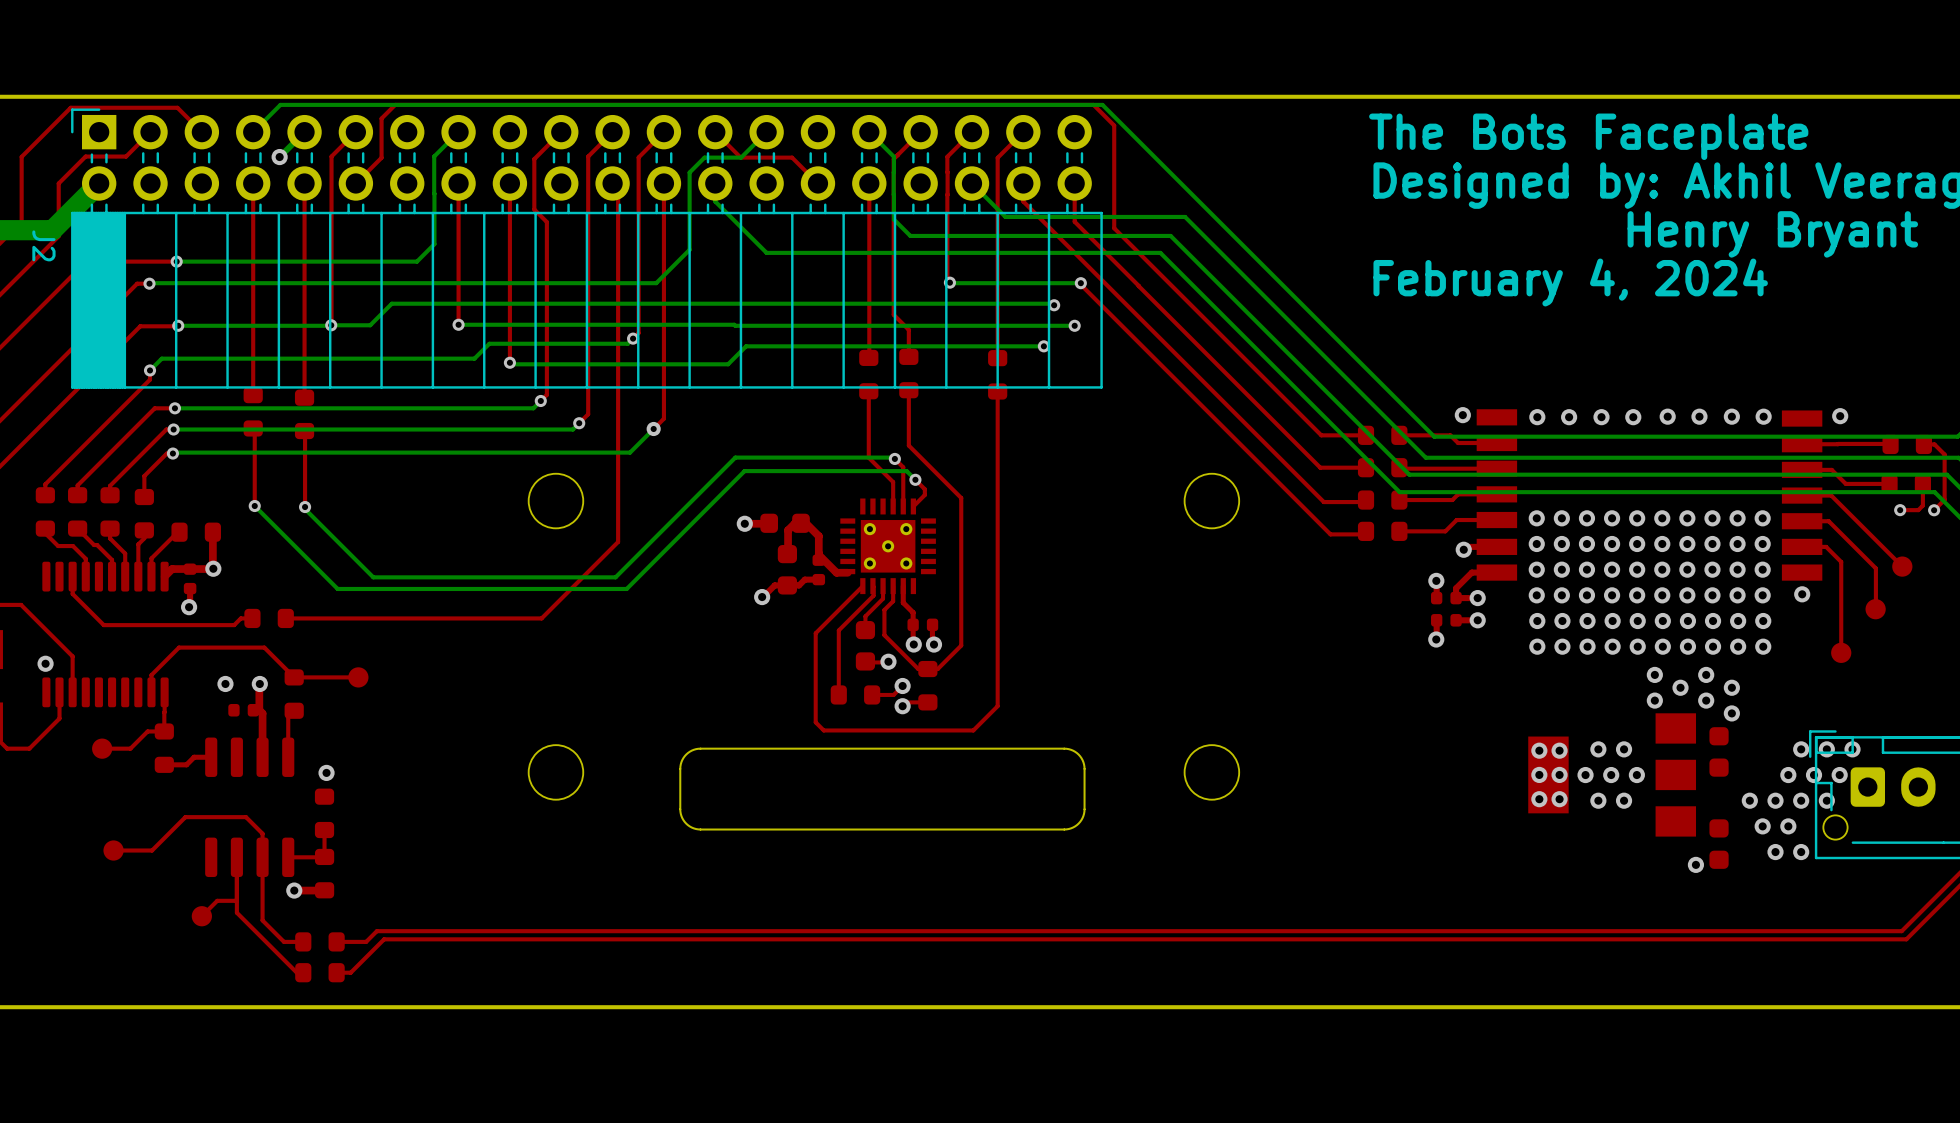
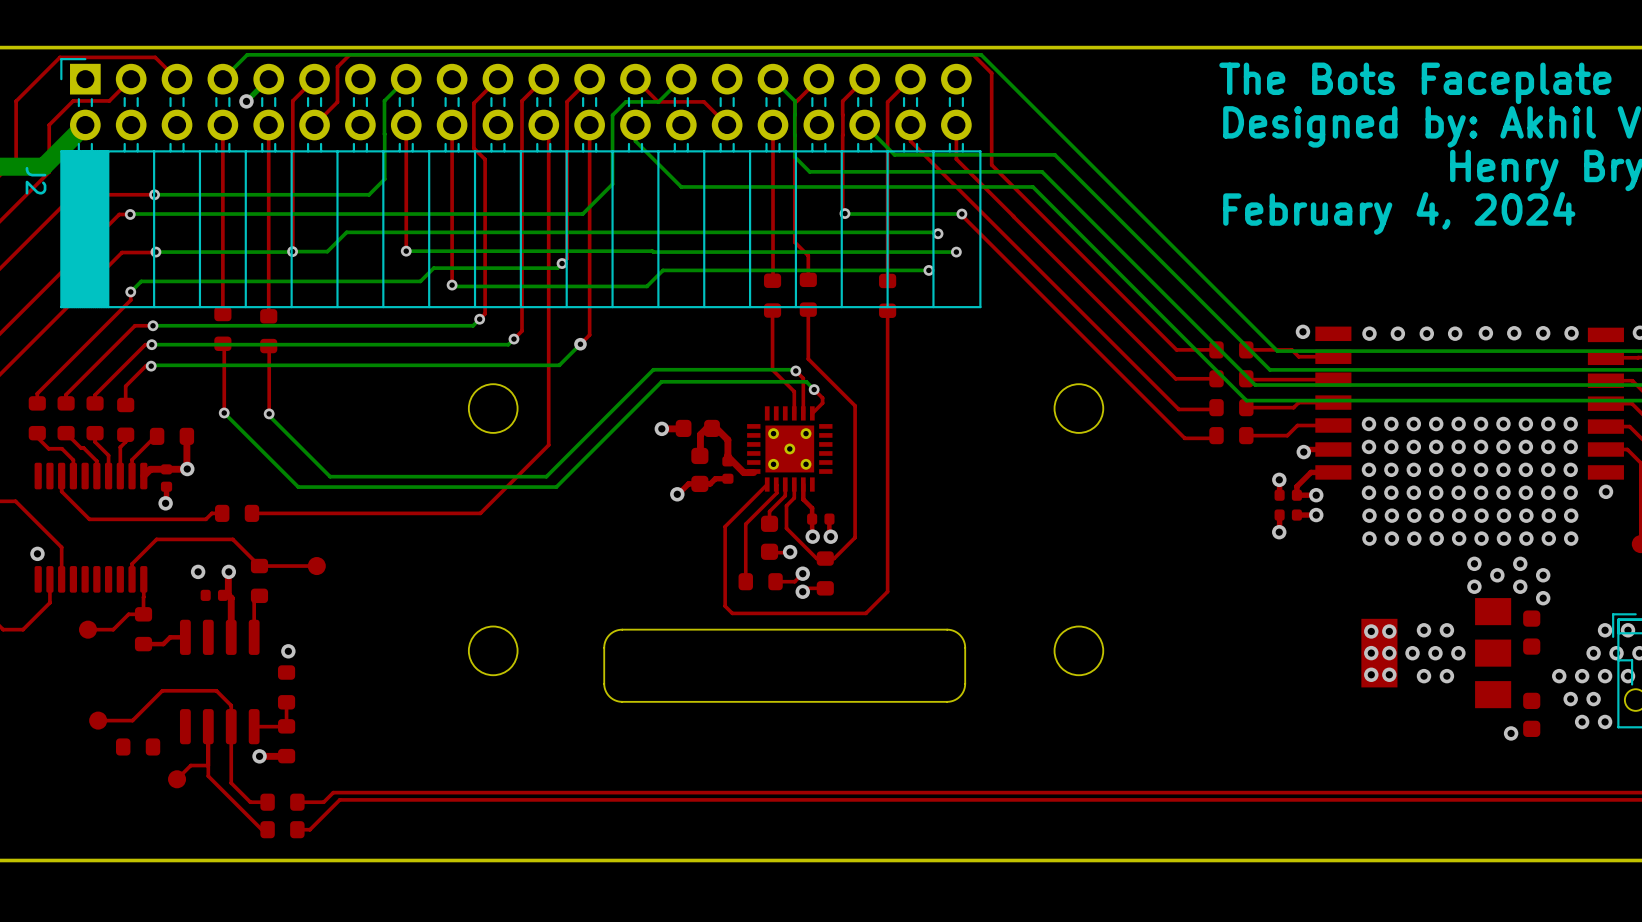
part: none -> (138, 746)

